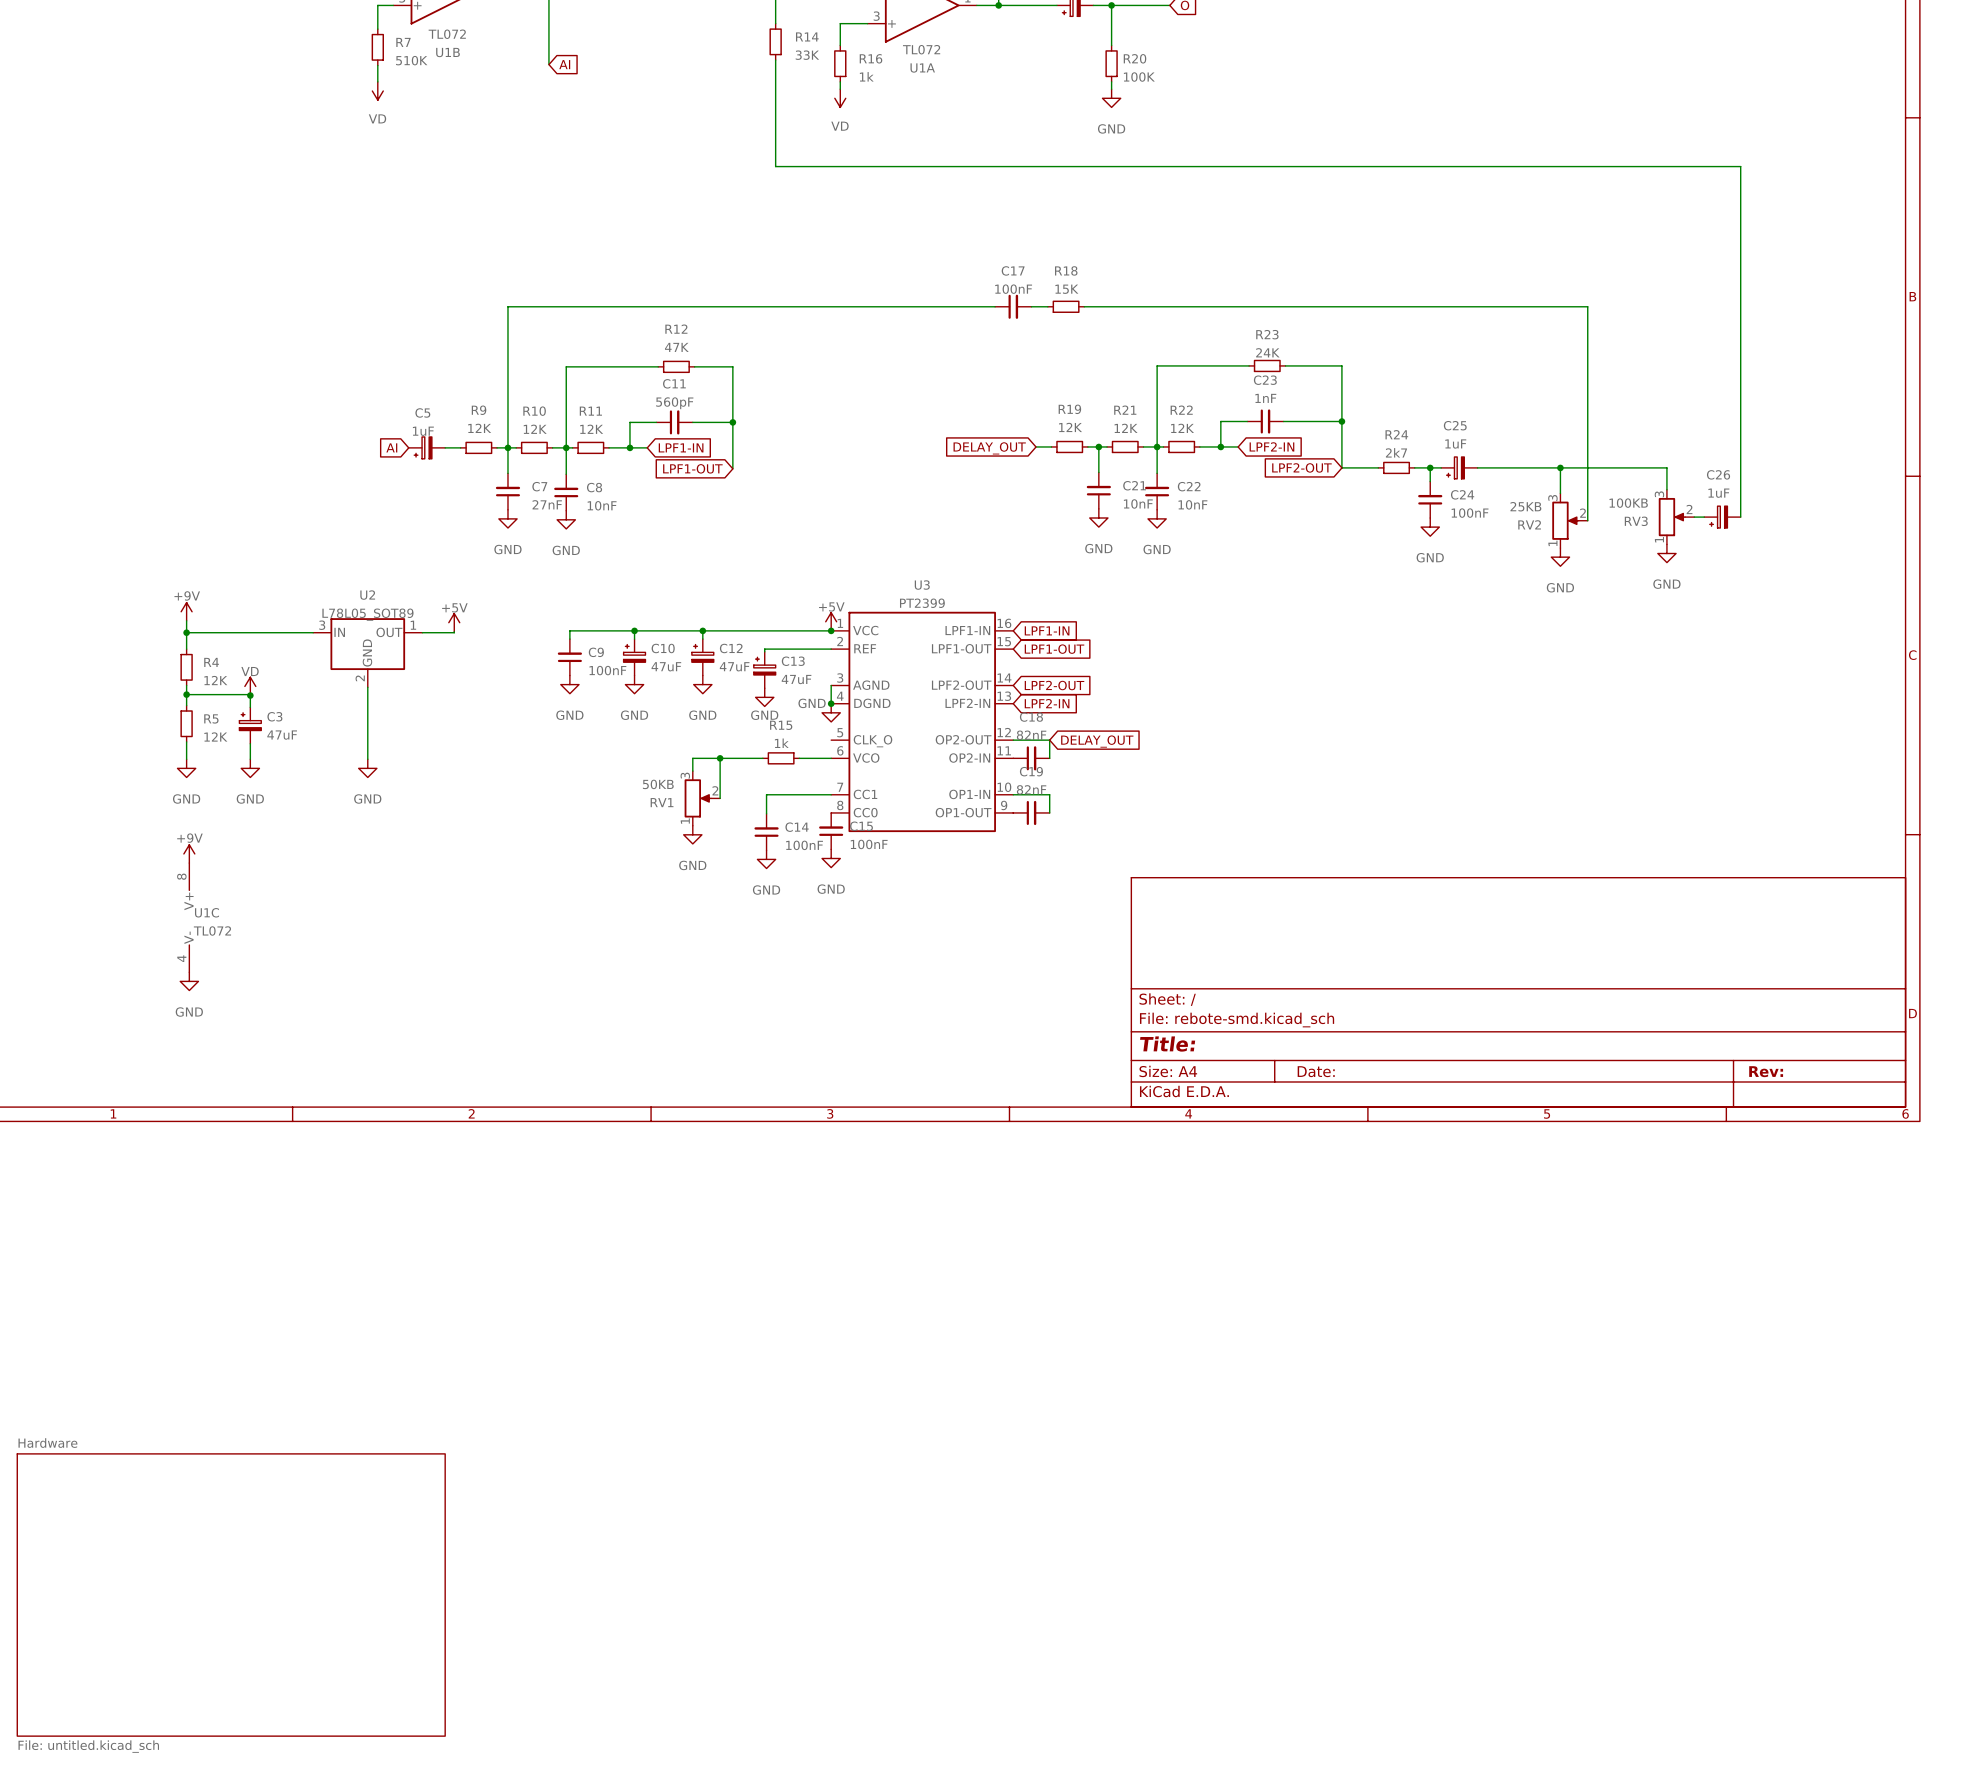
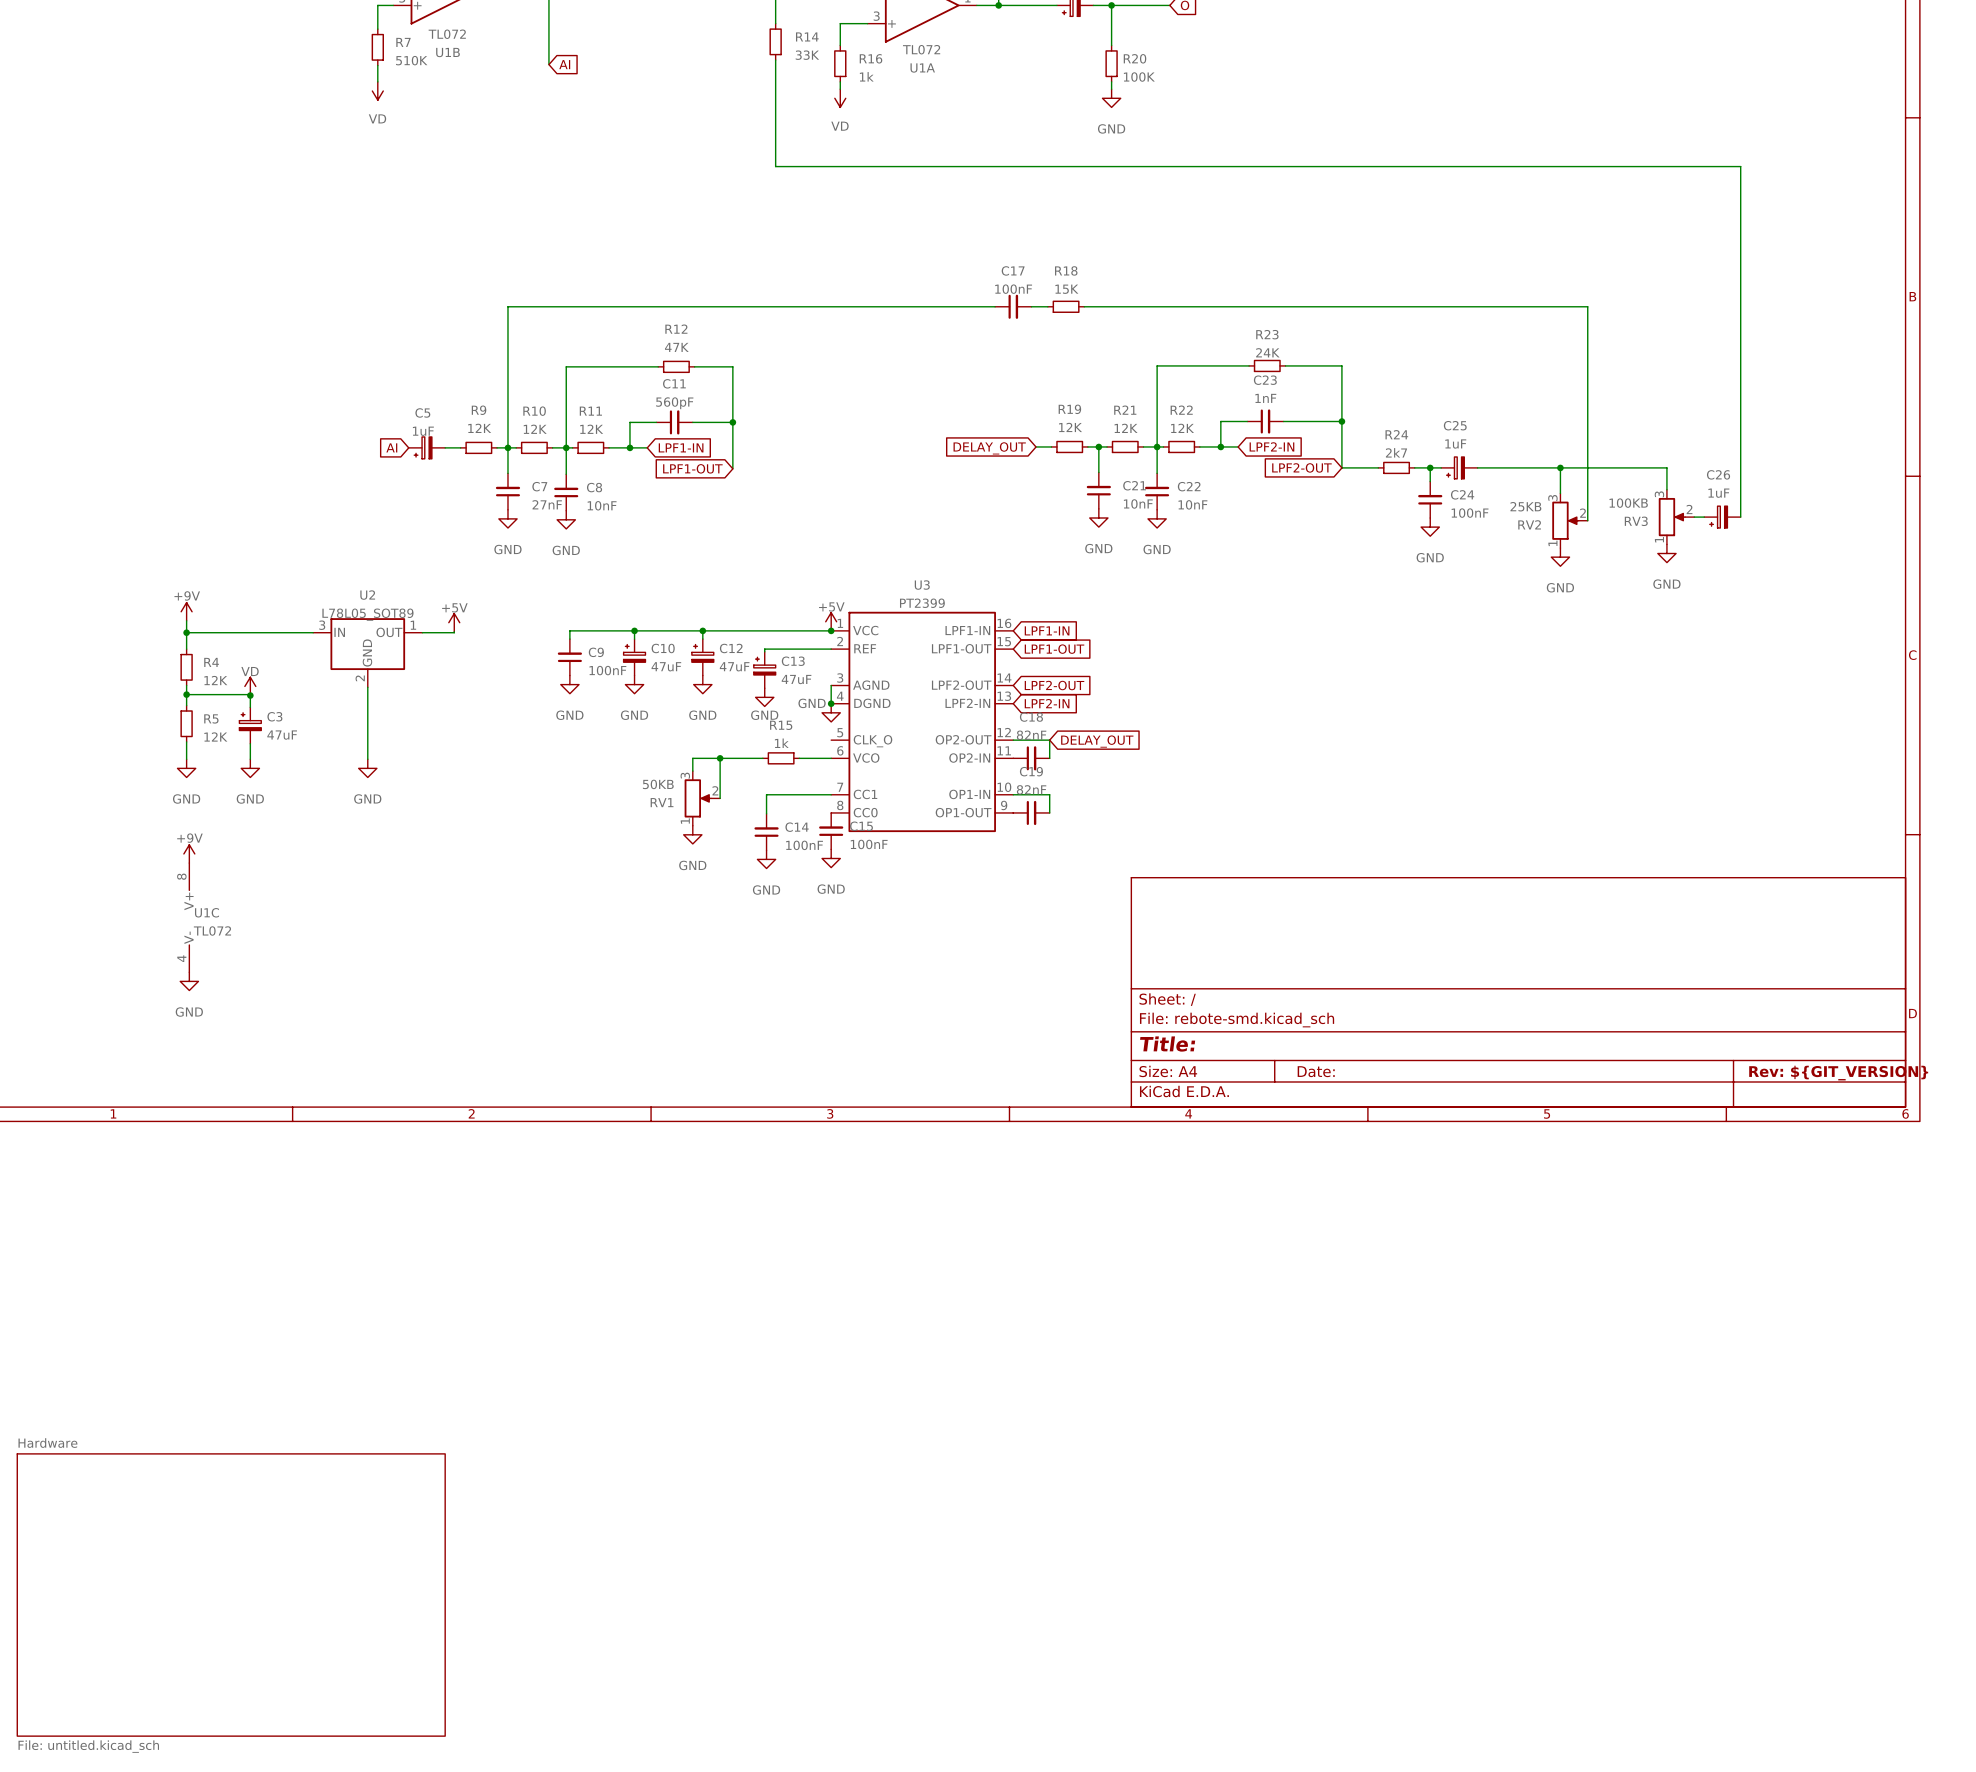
title block: Rev: (1766, 1071) -> Rev: ${GIT_VERSION} (1838, 1073)

